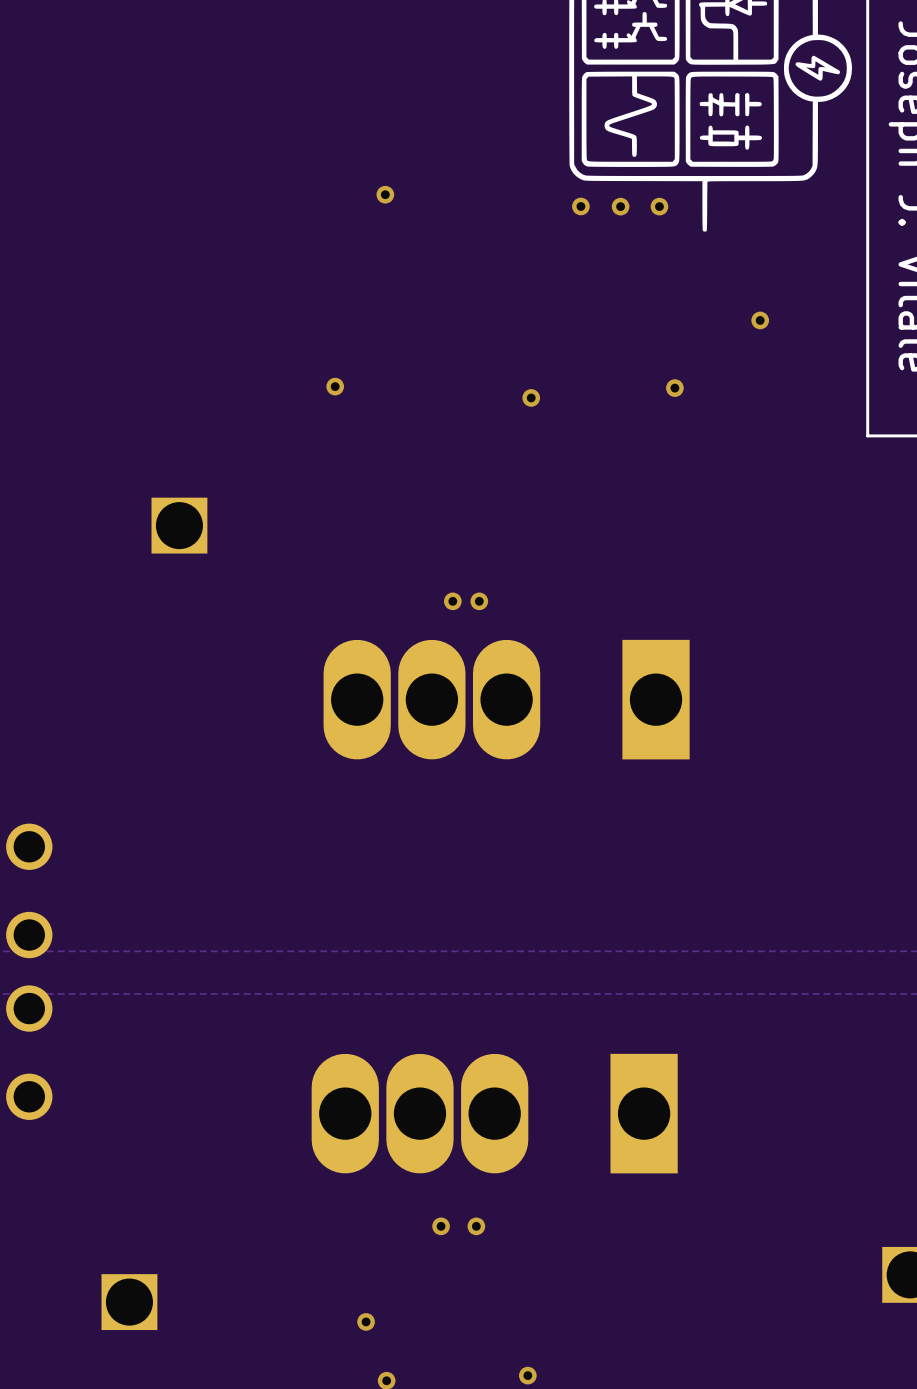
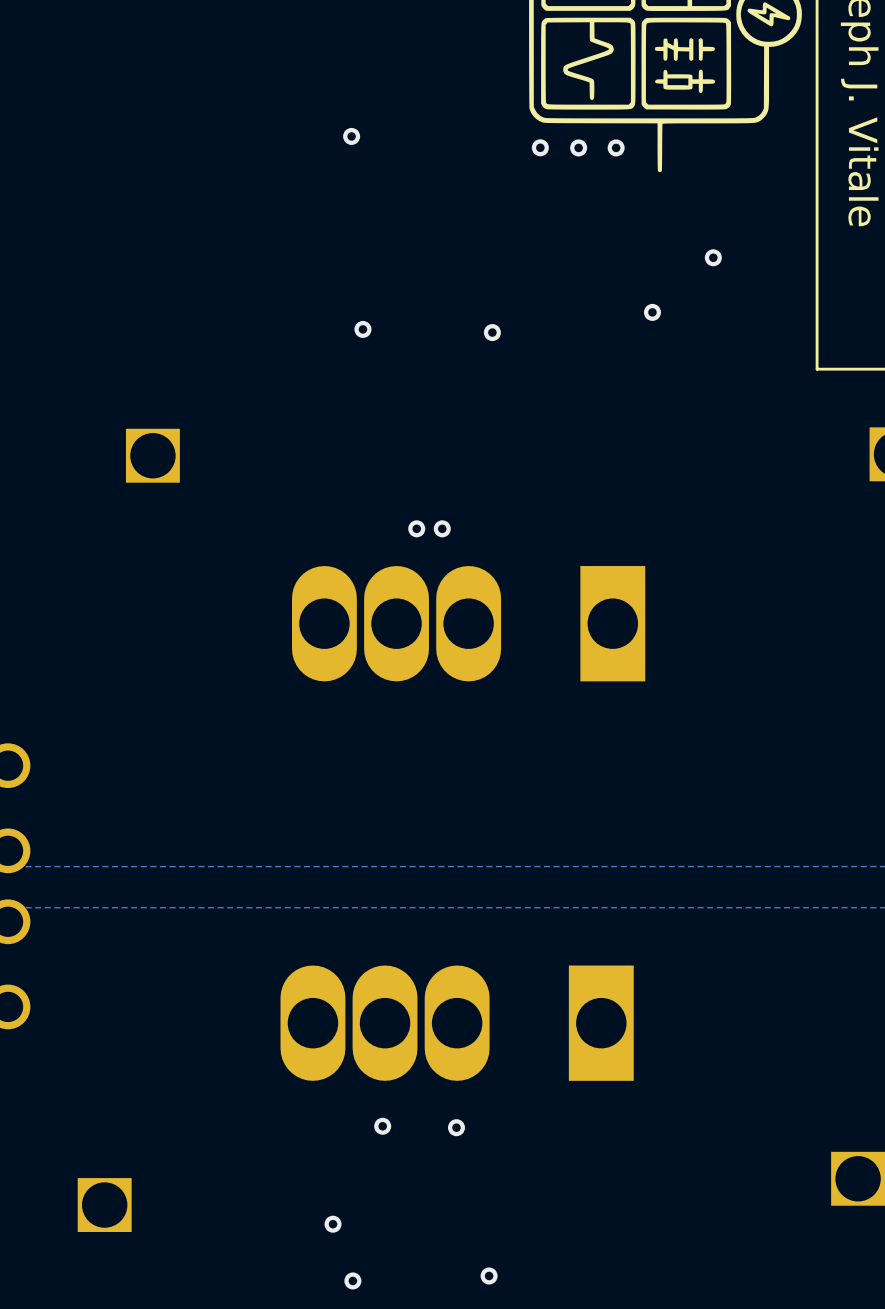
via position: (335, 386) -> (362, 329)
via position: (674, 388) -> (652, 312)
via position: (441, 1226) -> (382, 1126)
via position: (476, 1226) -> (456, 1127)

